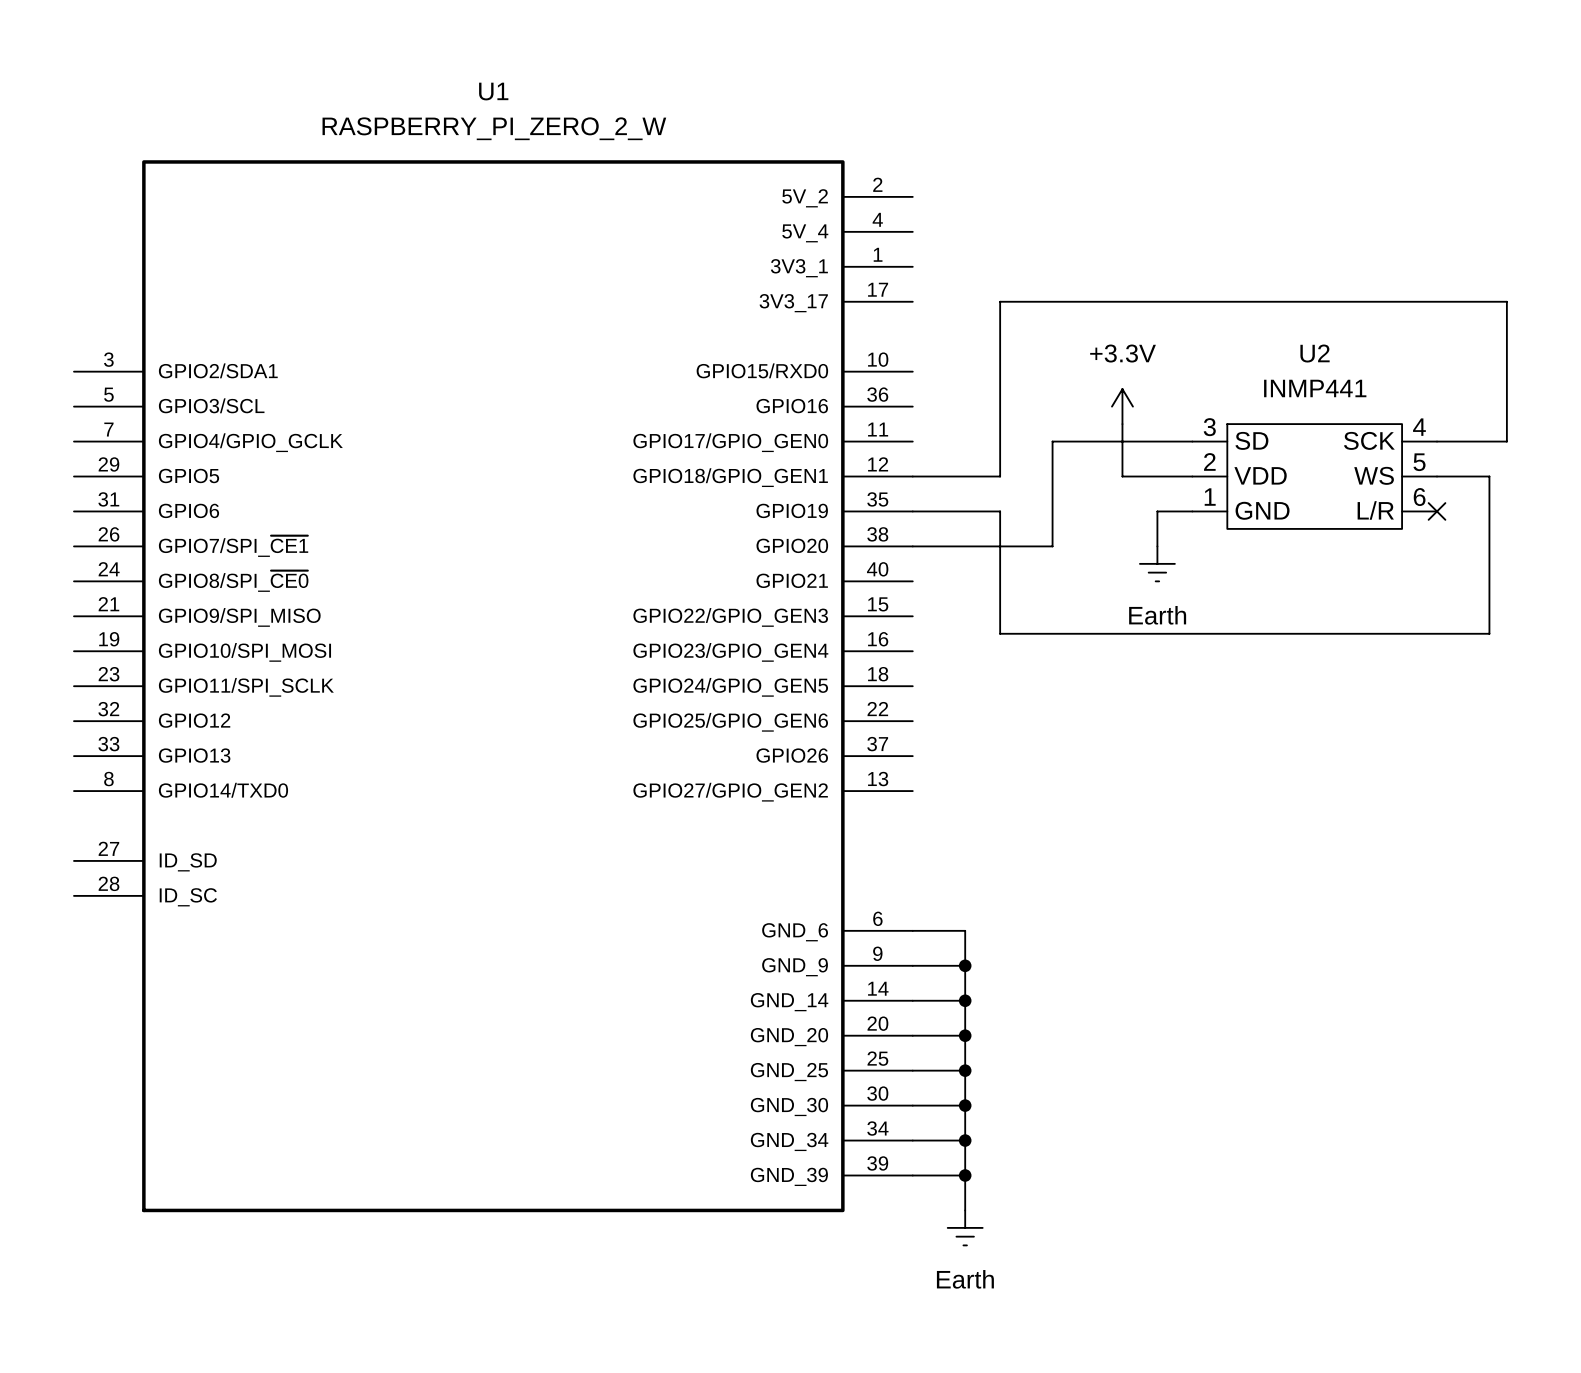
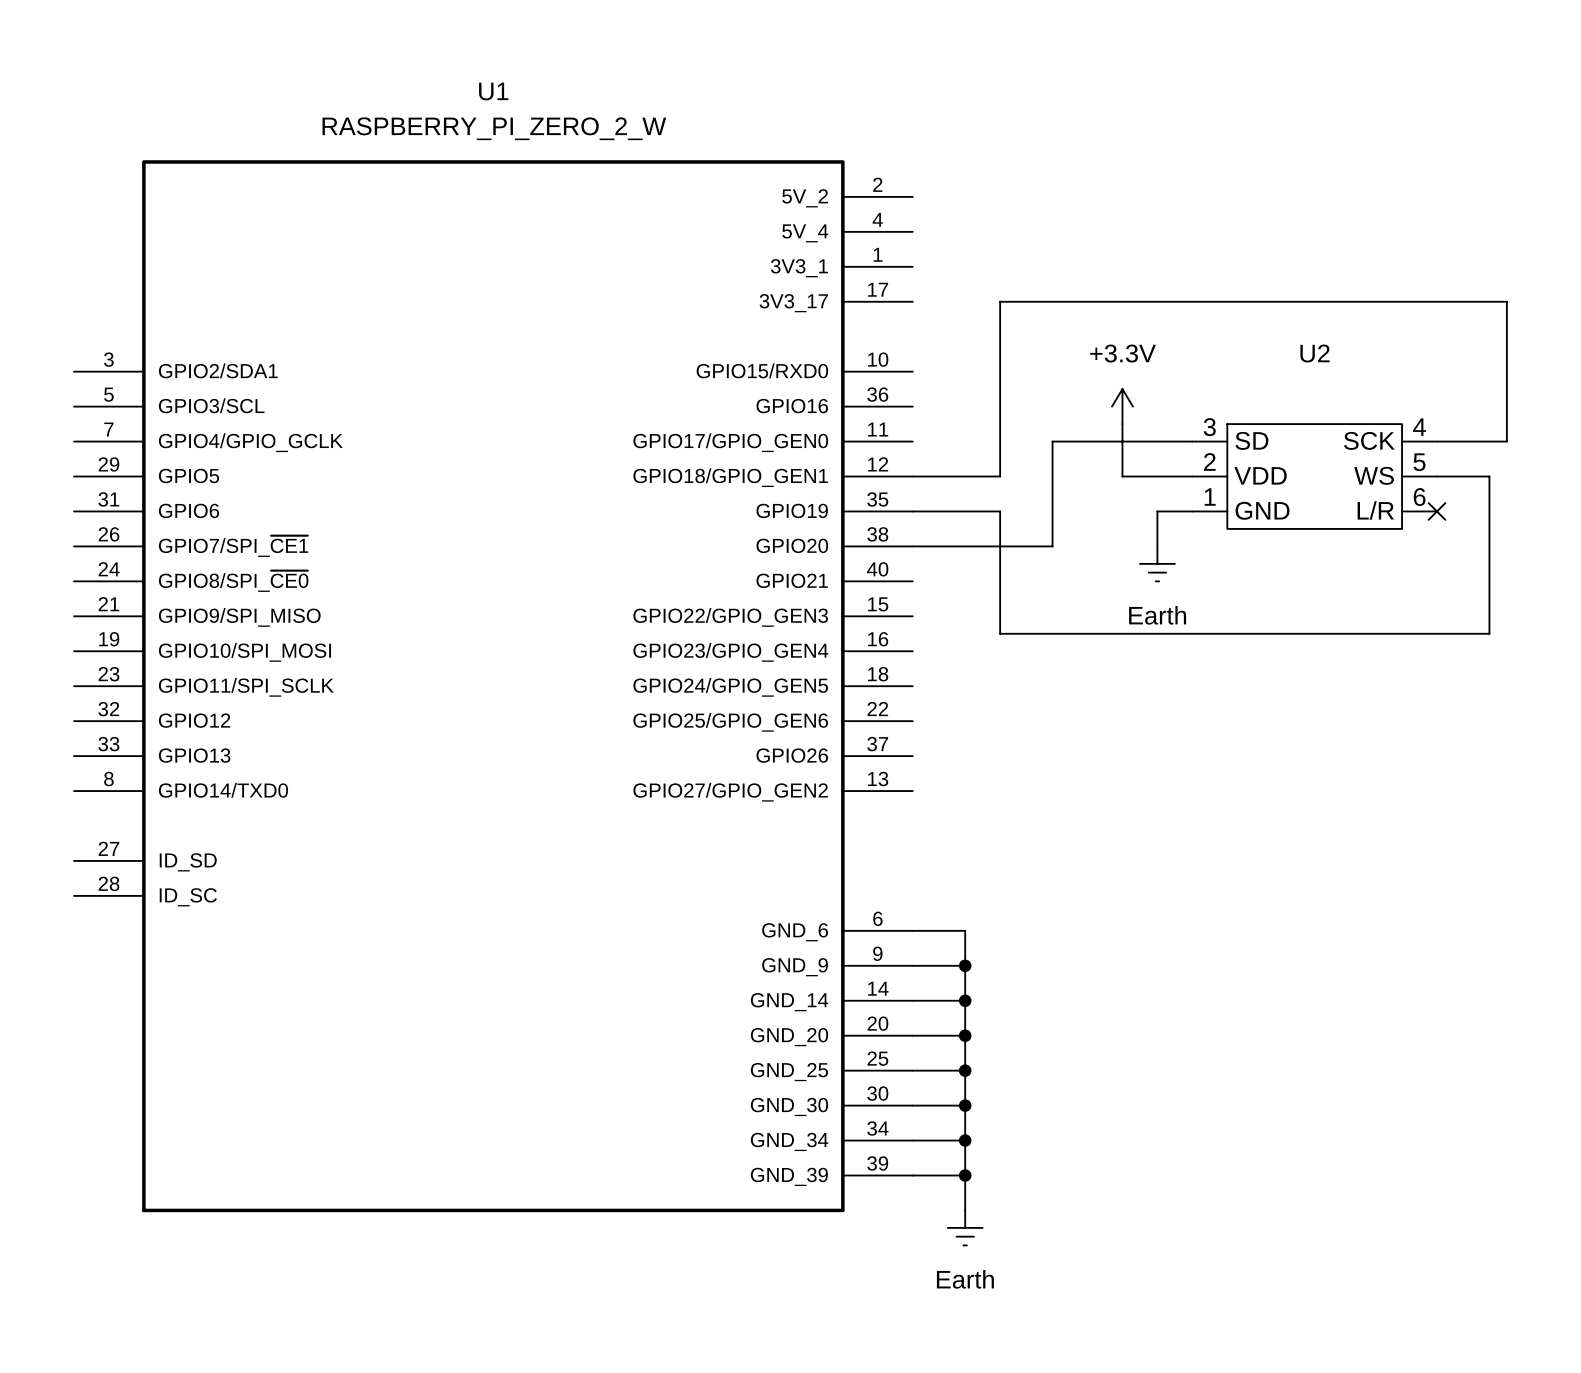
U2 value: INMP441 (1315, 388) -> none

